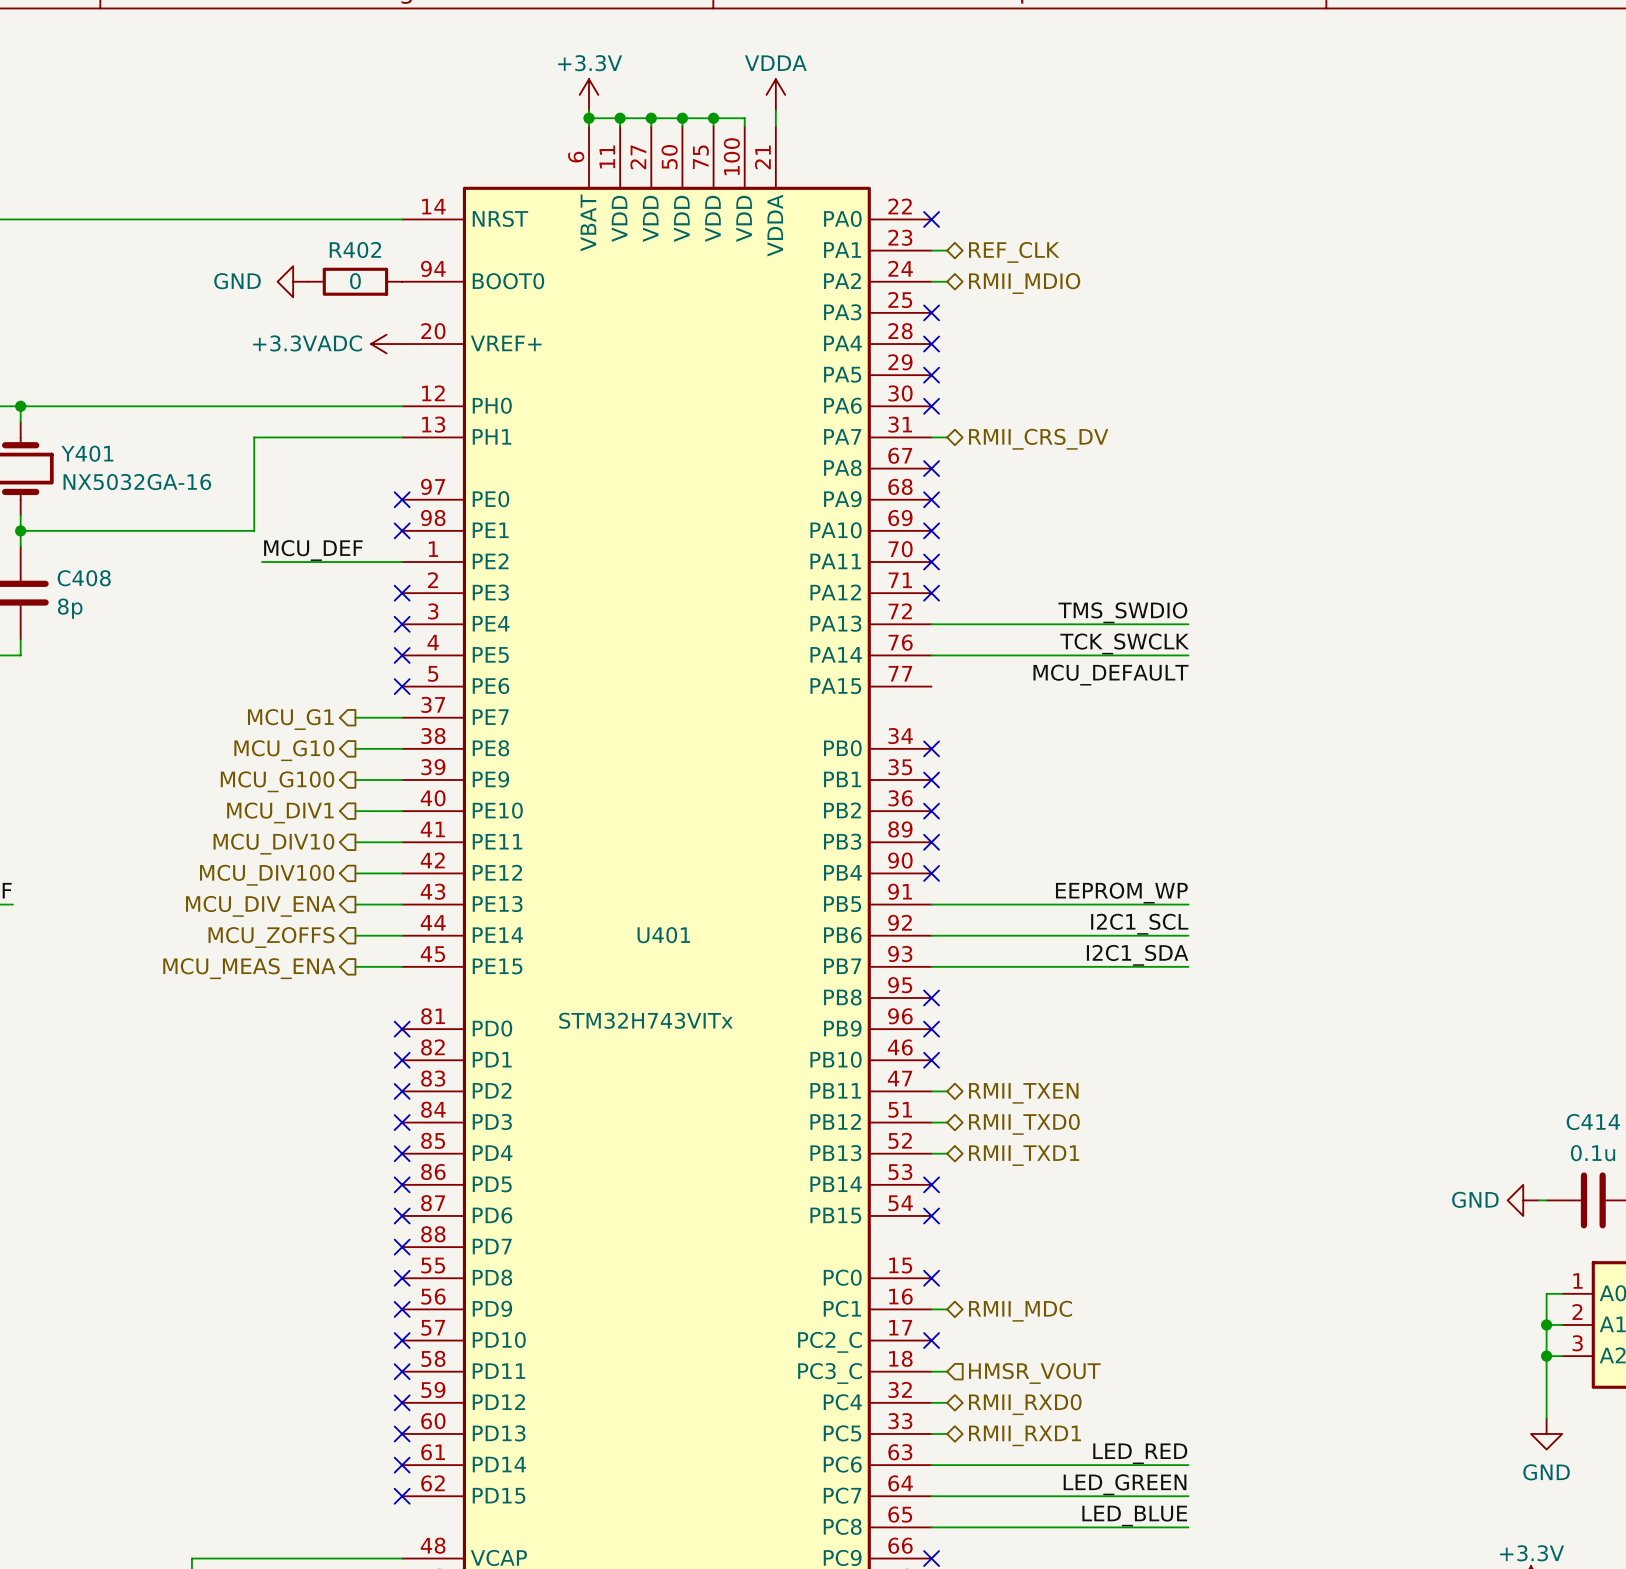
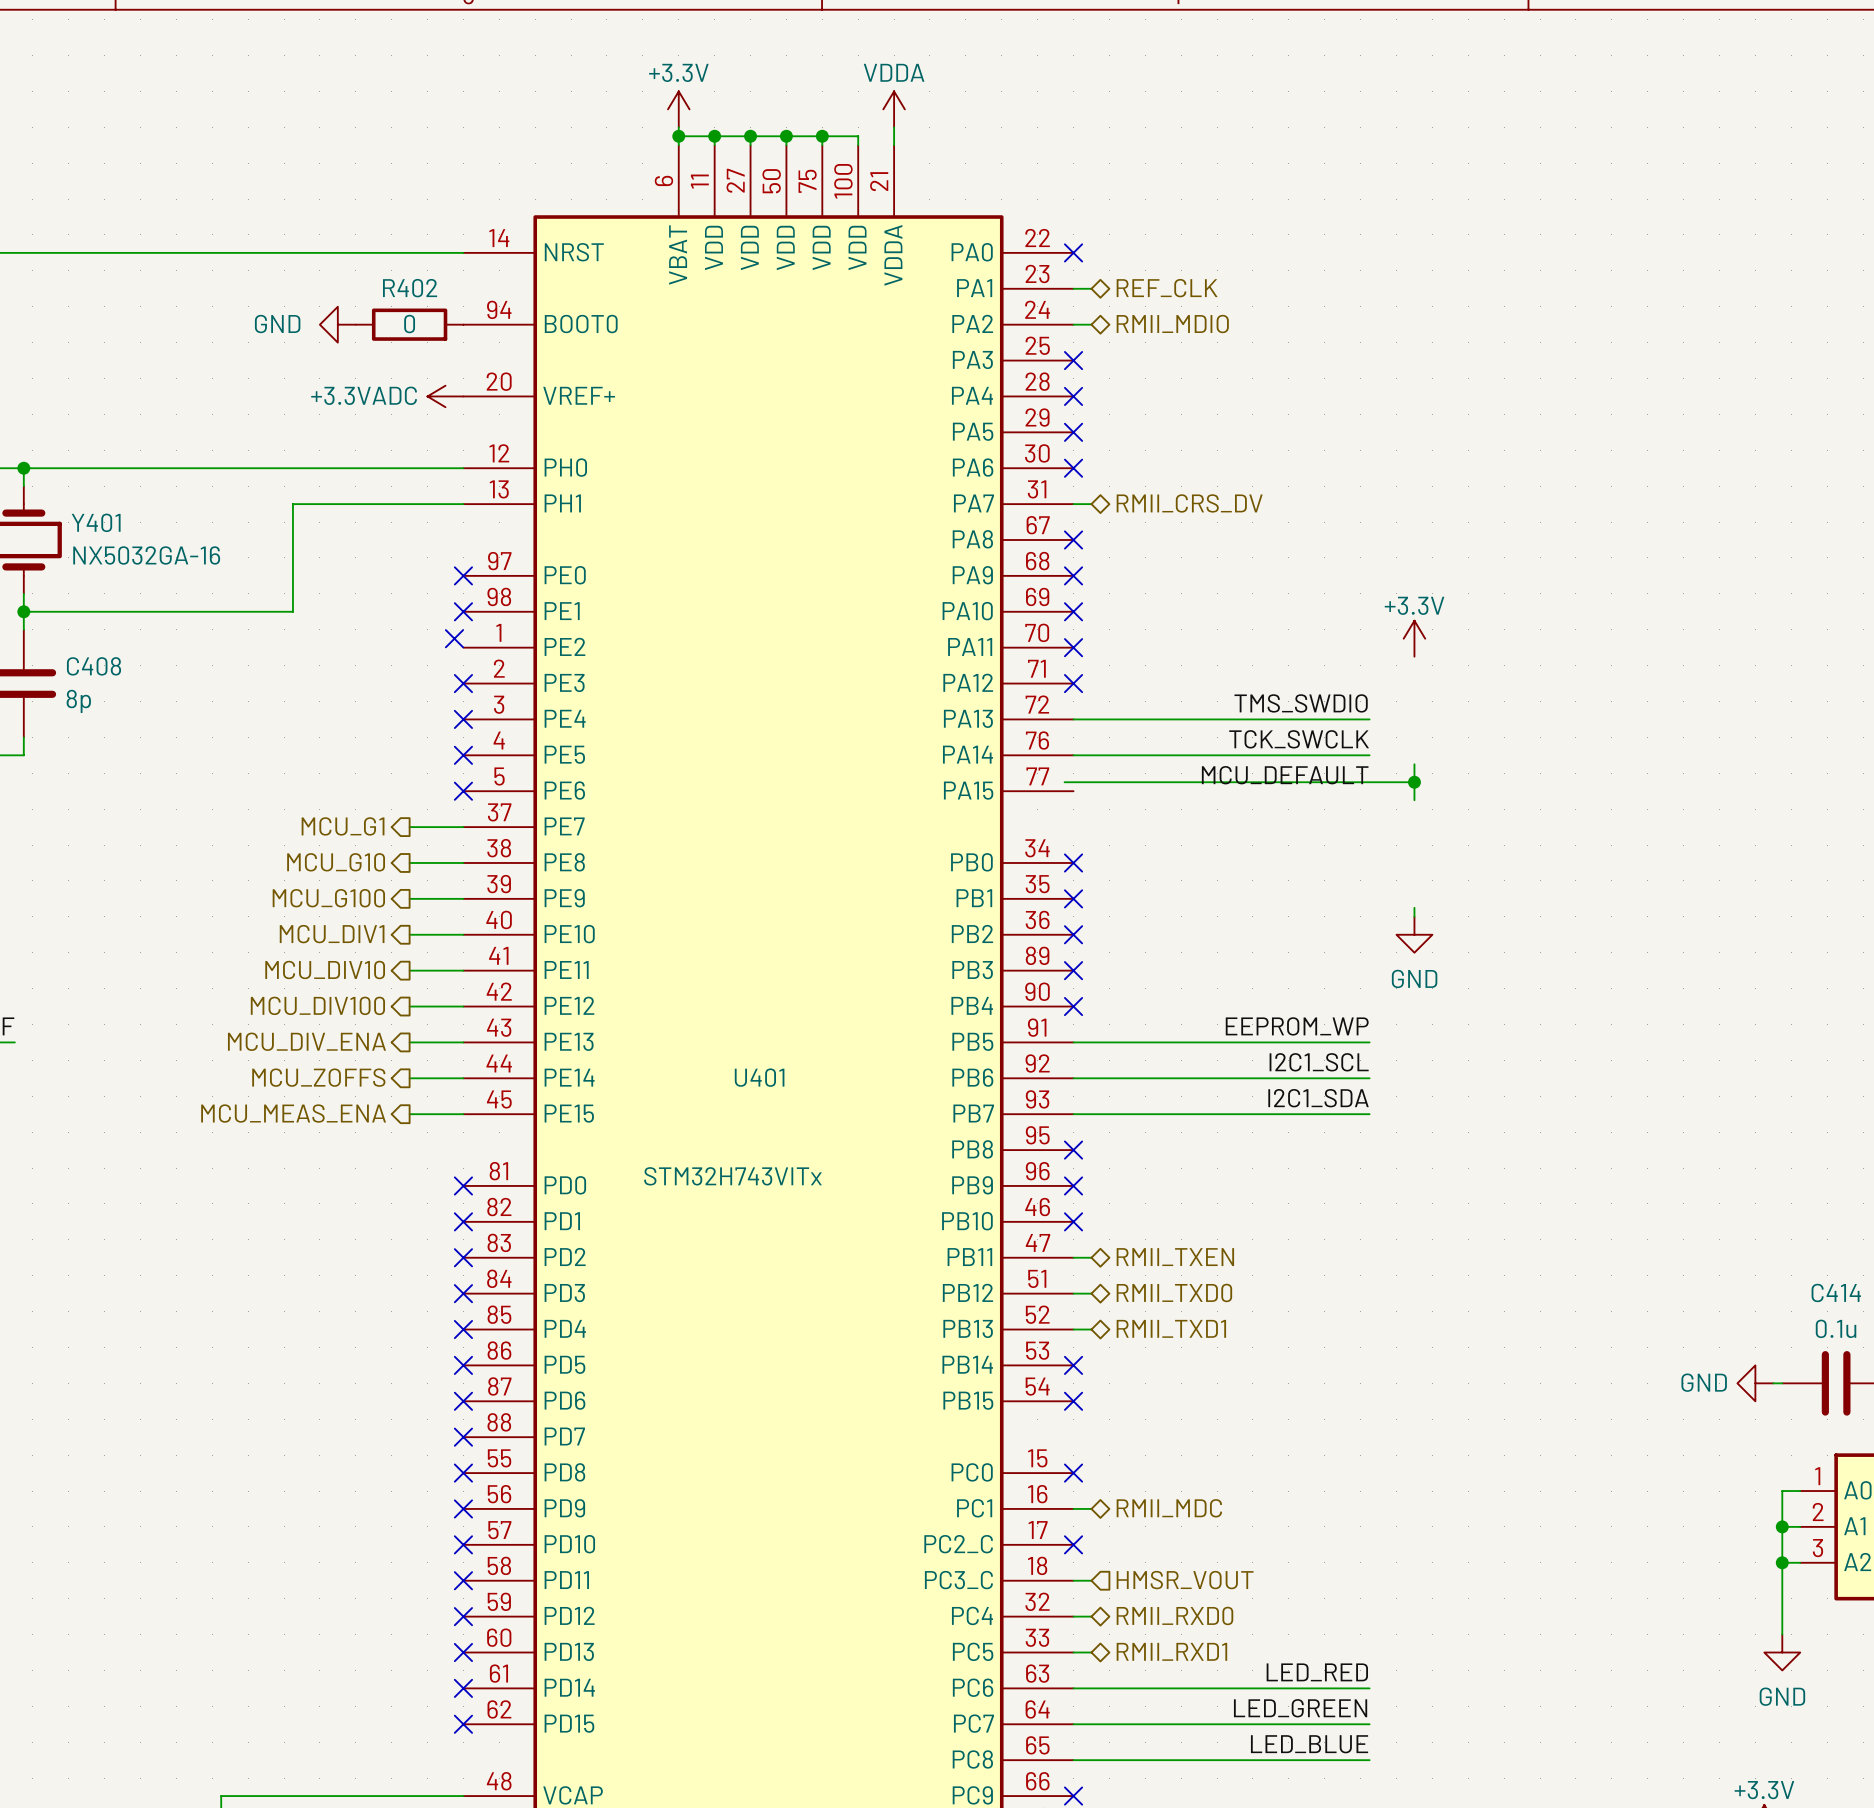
label: MCU_DEF (313, 550) -> none
no-connect mark: none -> (454, 638)
power symbol: none -> +3.3V (1414, 638)
wire: (262, 562) (402, 562) -> none
wire: none -> (1414, 764) (1414, 800)
wire: none -> (1064, 782) (1414, 782)
junction: none -> (1414, 782)
wire: none -> (1414, 907) (1414, 916)
power symbol: none -> GND (1414, 934)

